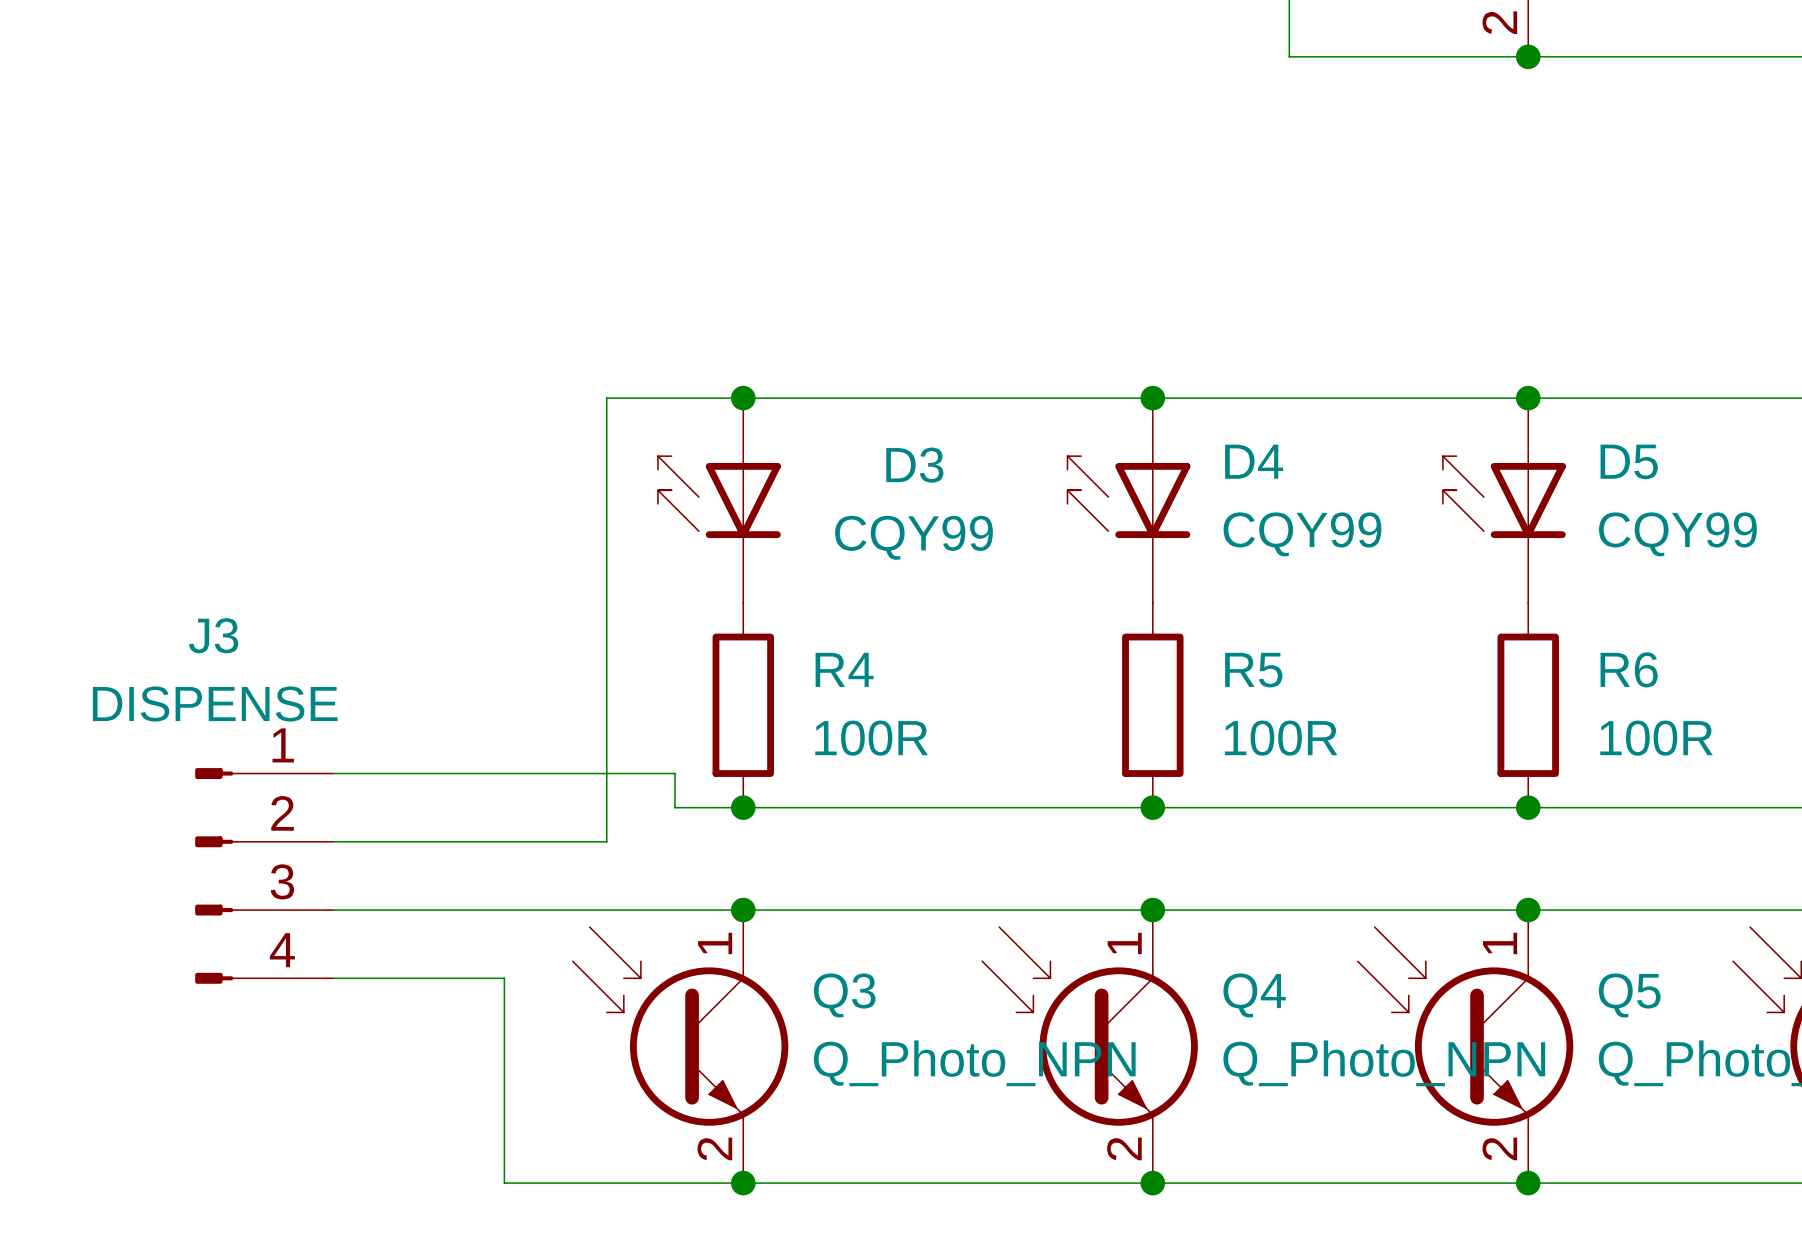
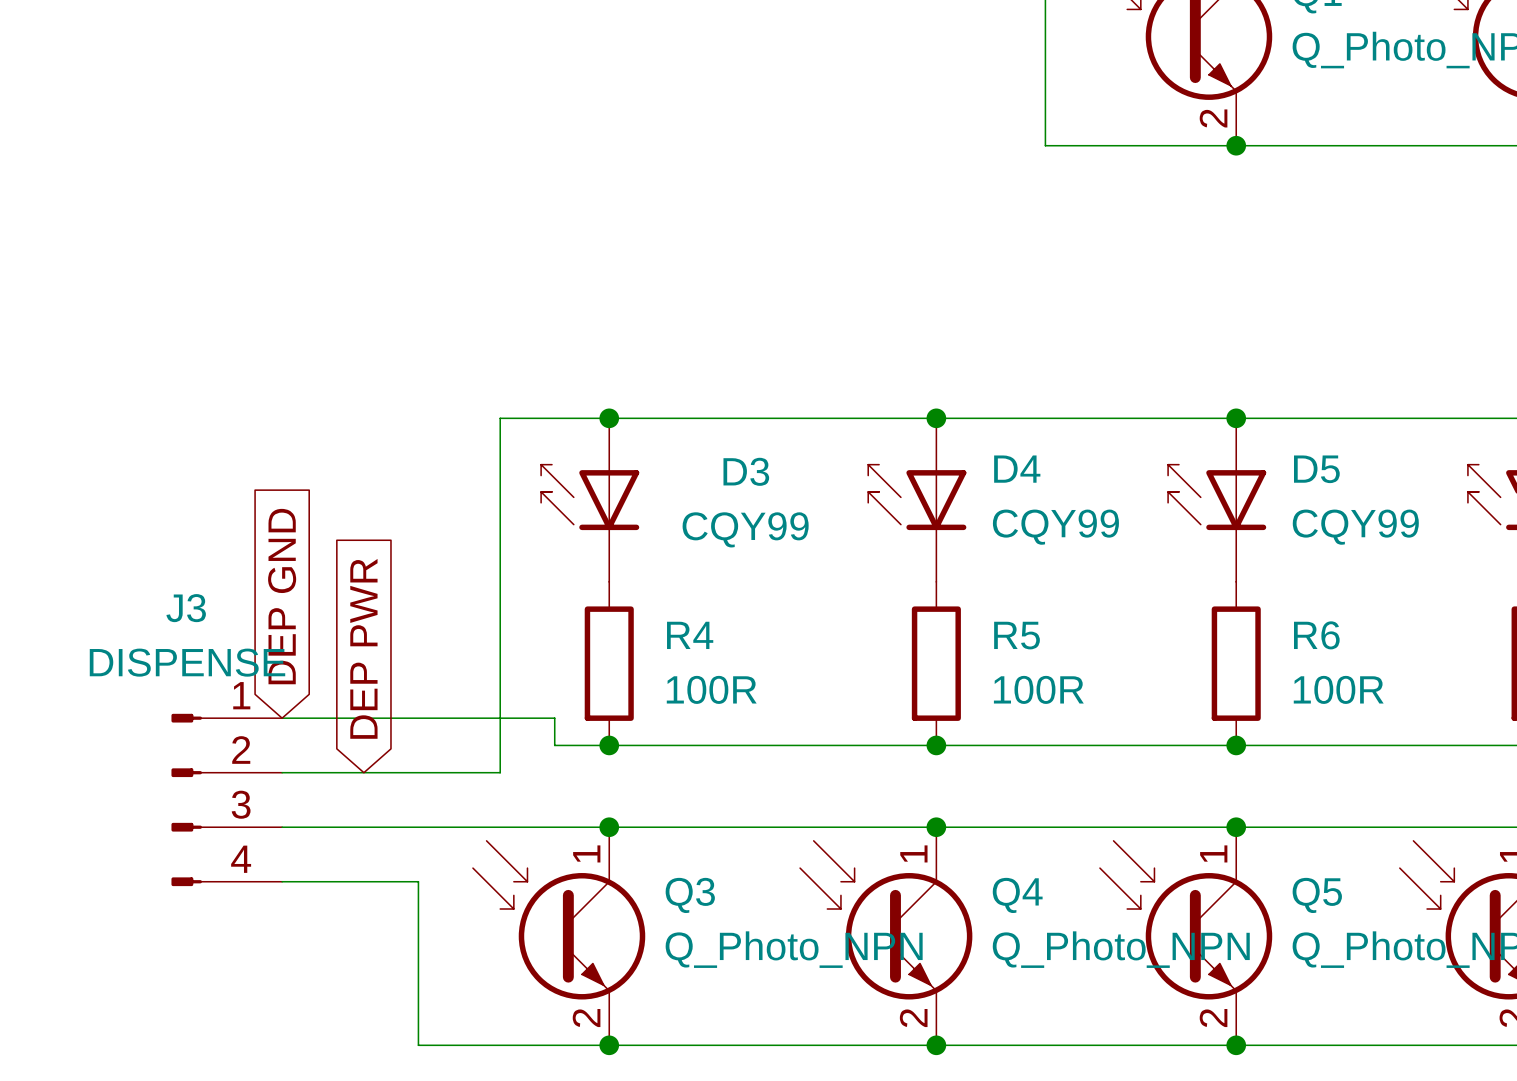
global label: none -> DEP GND (282, 596)
global label: none -> DEP PWR (363, 648)

